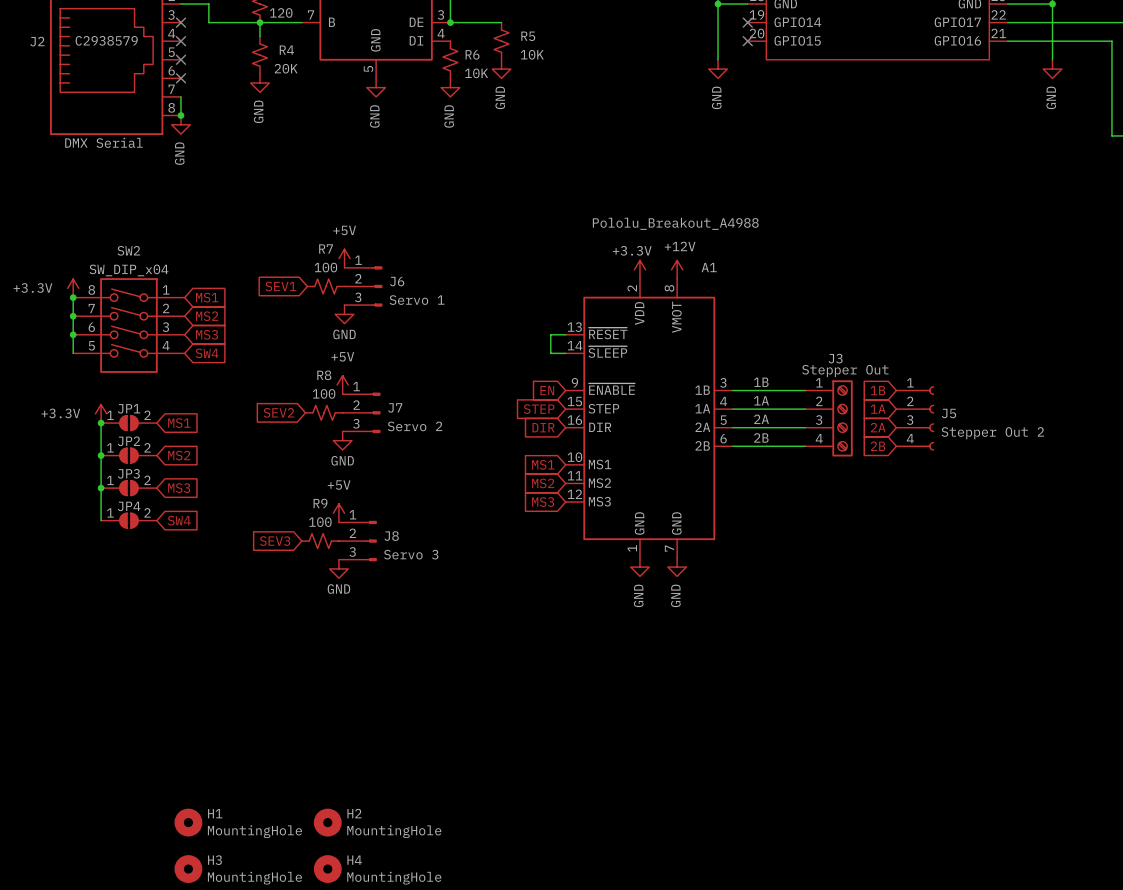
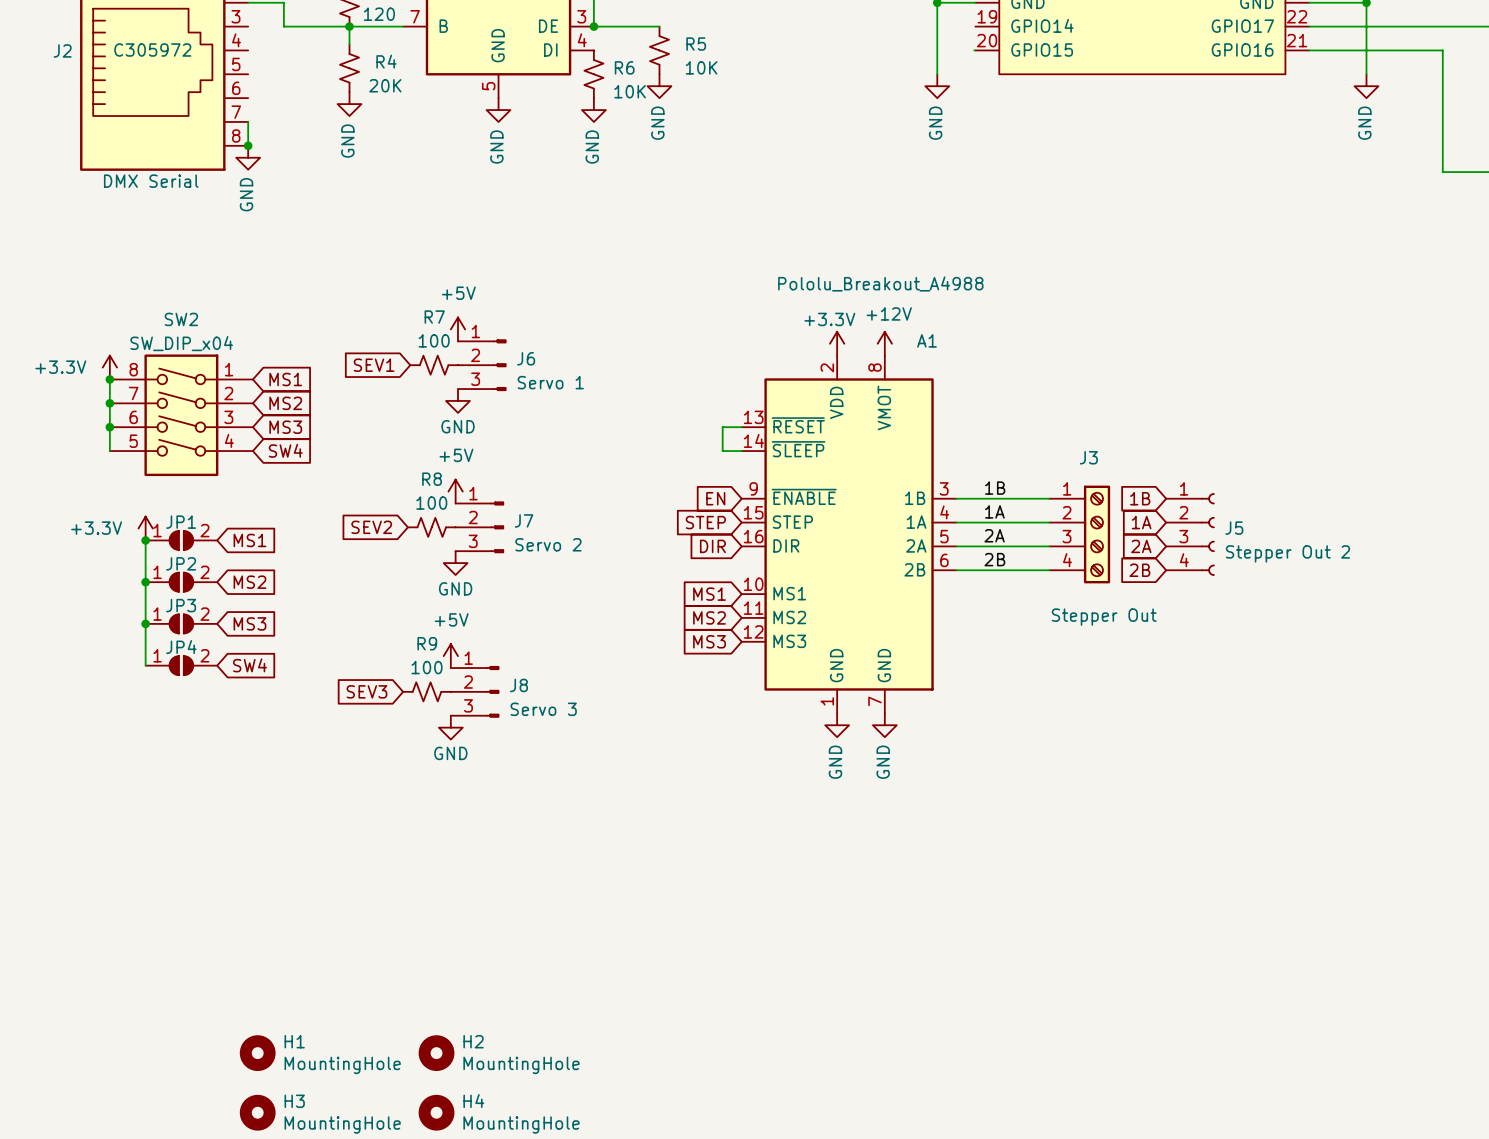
no-connect mark: (180, 22) -> none
no-connect mark: (747, 22) -> none
J2 text: C2938579 (106, 40) -> C305972 (152, 49)
no-connect mark: (180, 41) -> none
no-connect mark: (747, 41) -> none
no-connect mark: (180, 59) -> none
no-connect mark: (180, 78) -> none
J3 value position: Stepper Out (845, 371) -> Stepper Out (1104, 617)

